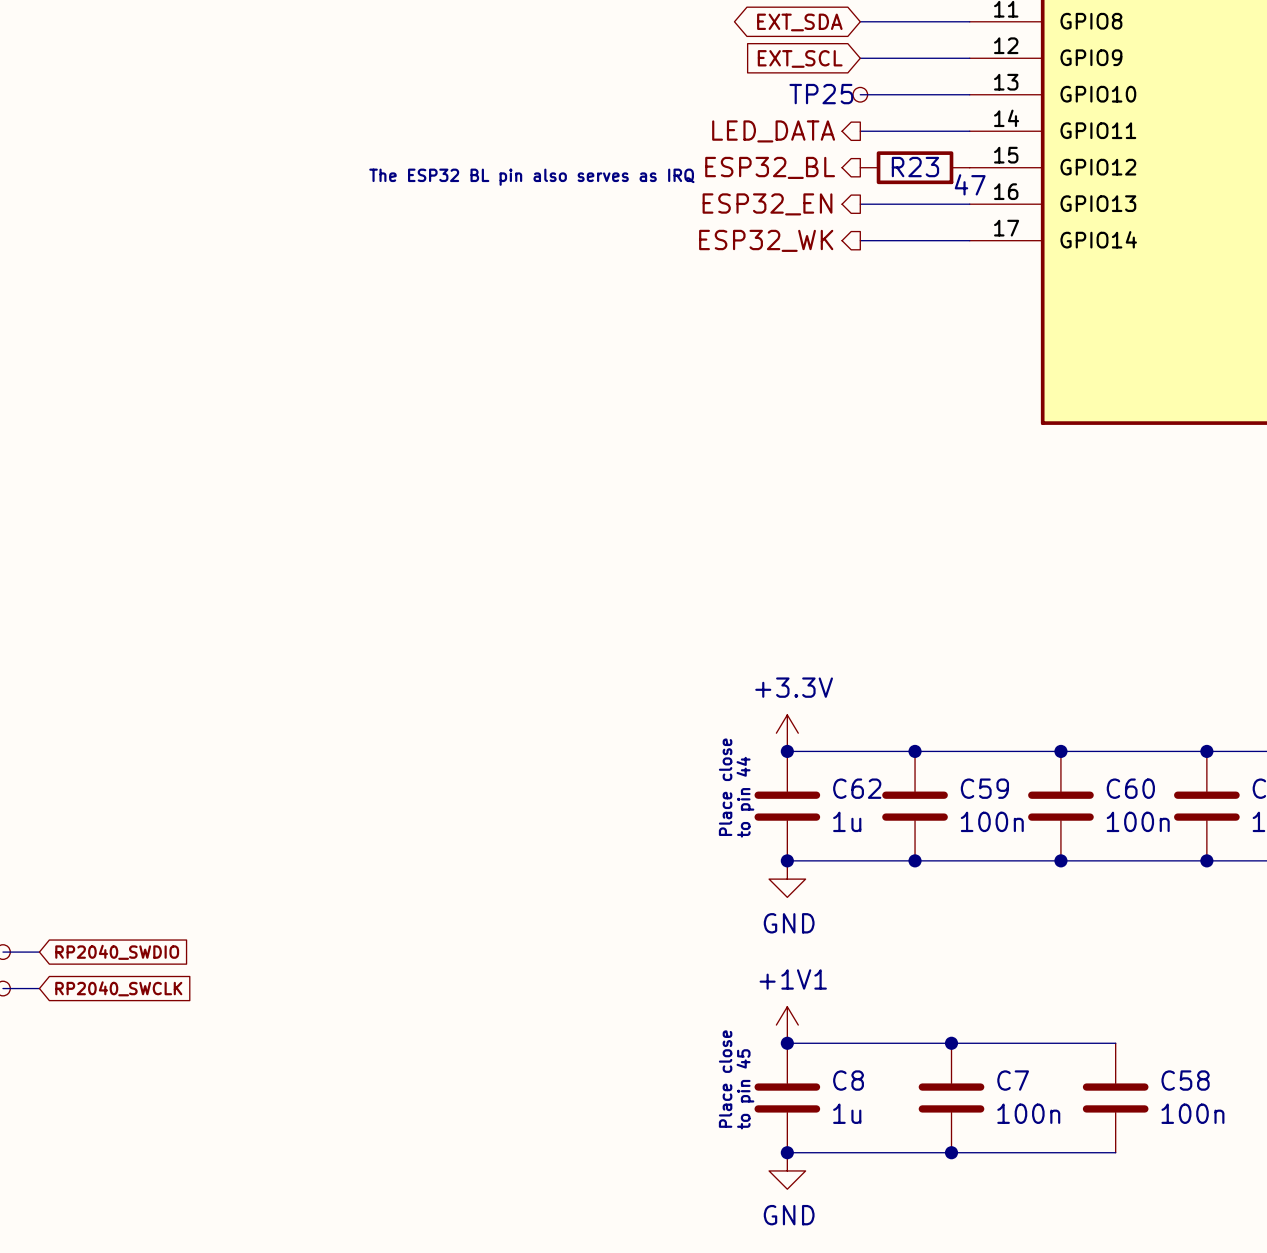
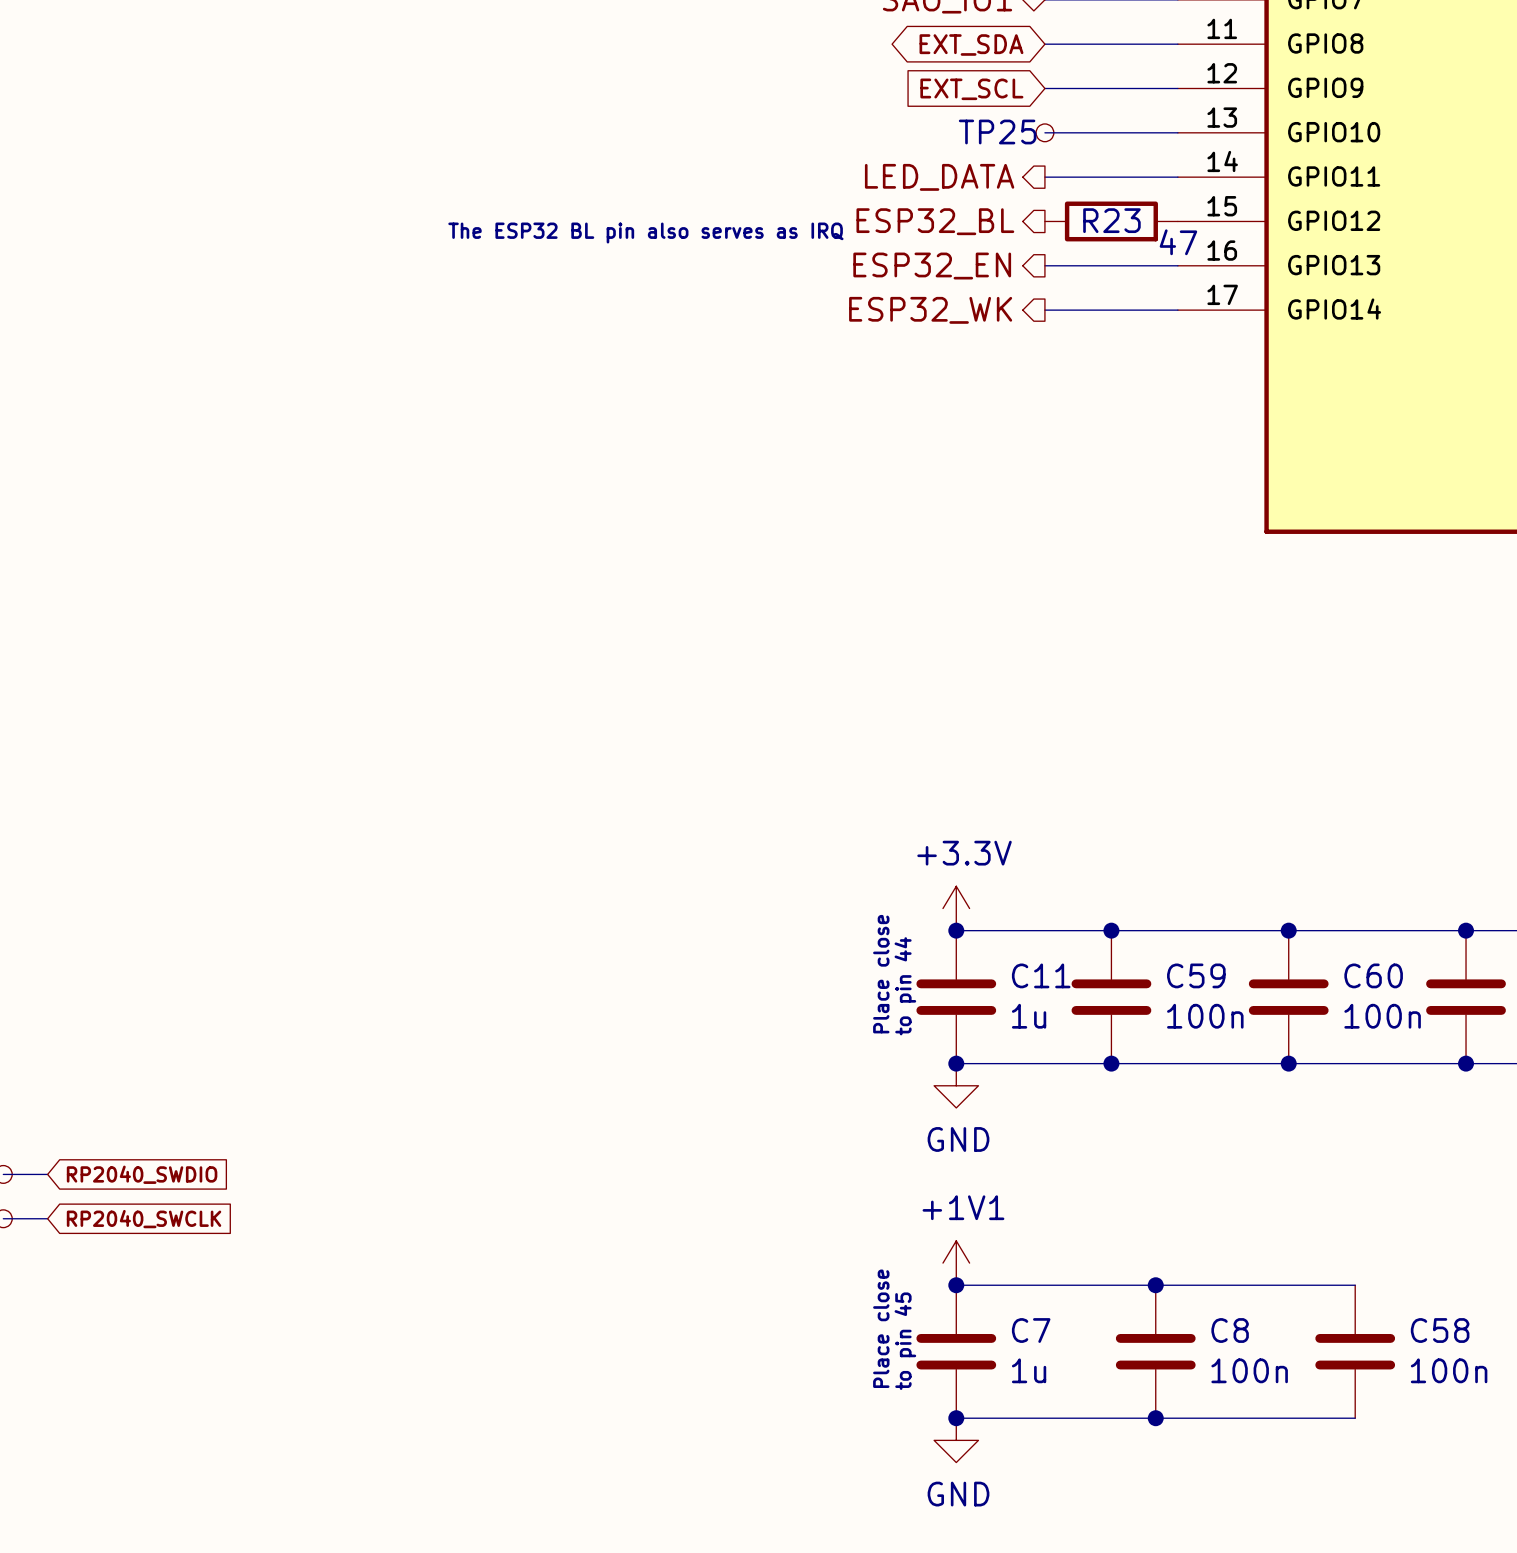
C62 name: C62 (857, 788) -> C11 (1041, 975)
C8 name: C8 (848, 1080) -> C7 (1031, 1330)
C7 name: C7 (1013, 1080) -> C8 (1230, 1330)

